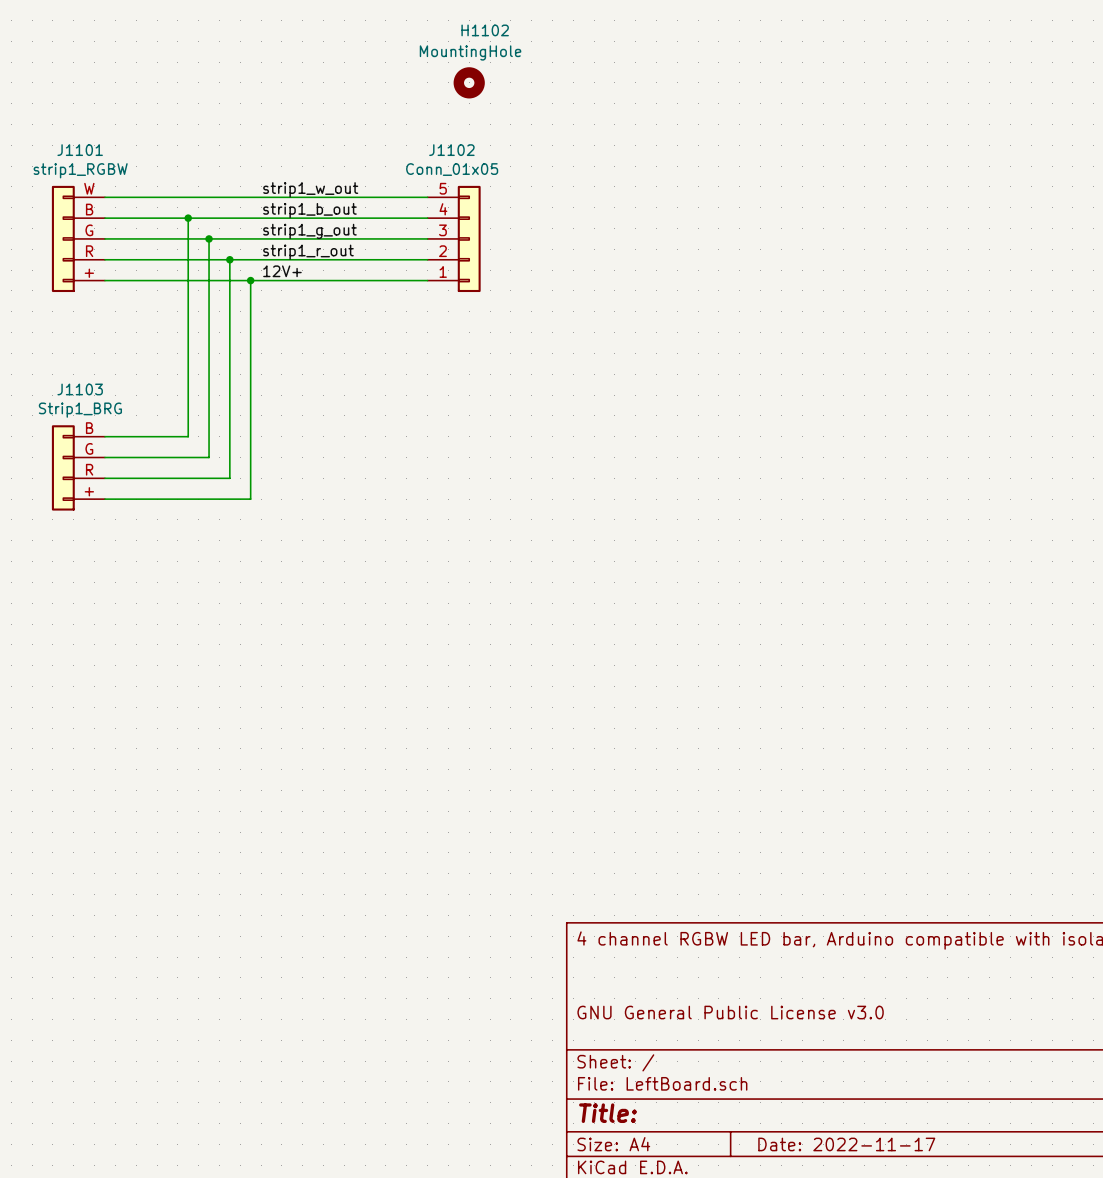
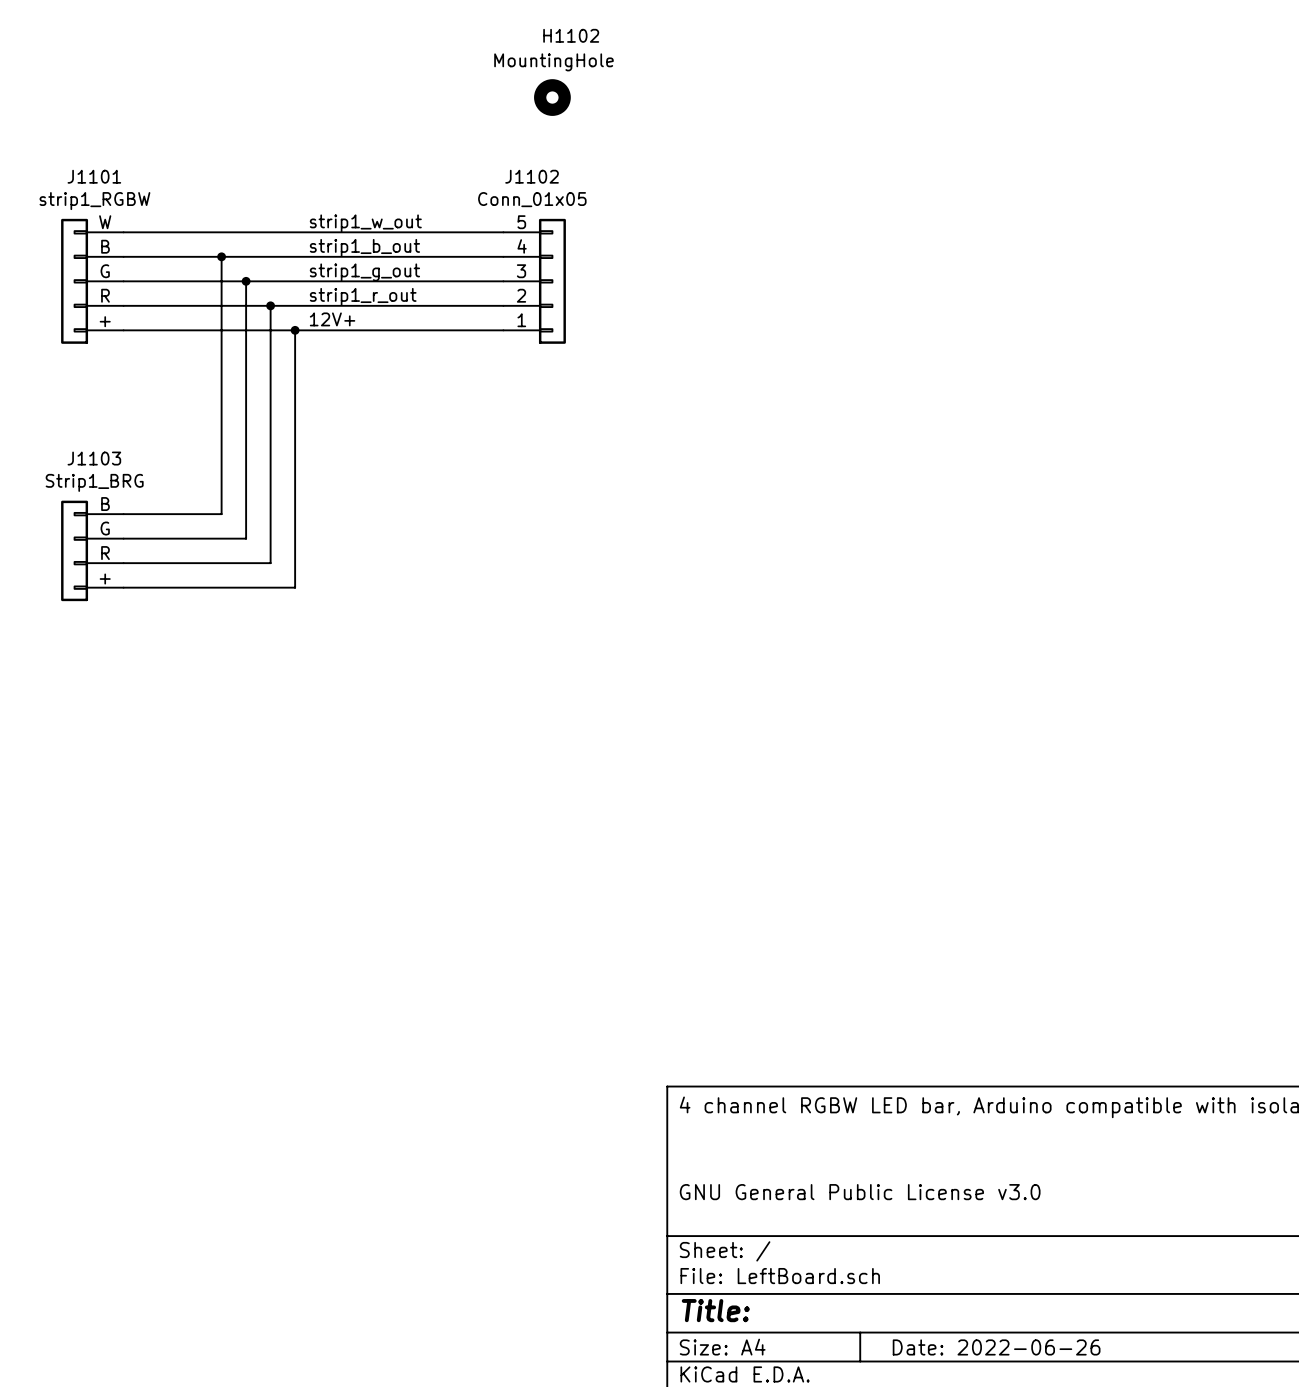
title block: Date: 2022-11-17 (846, 1144) -> Date: 2022-06-26 (996, 1347)

